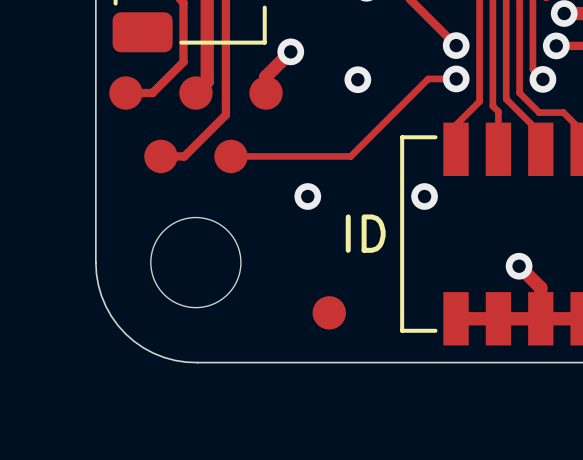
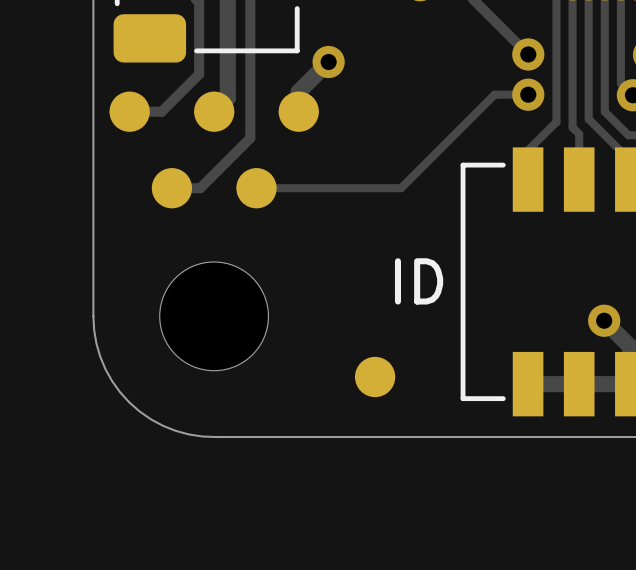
via: (357, 79) -> none
via: (307, 196) -> none
via: (424, 196) -> none

